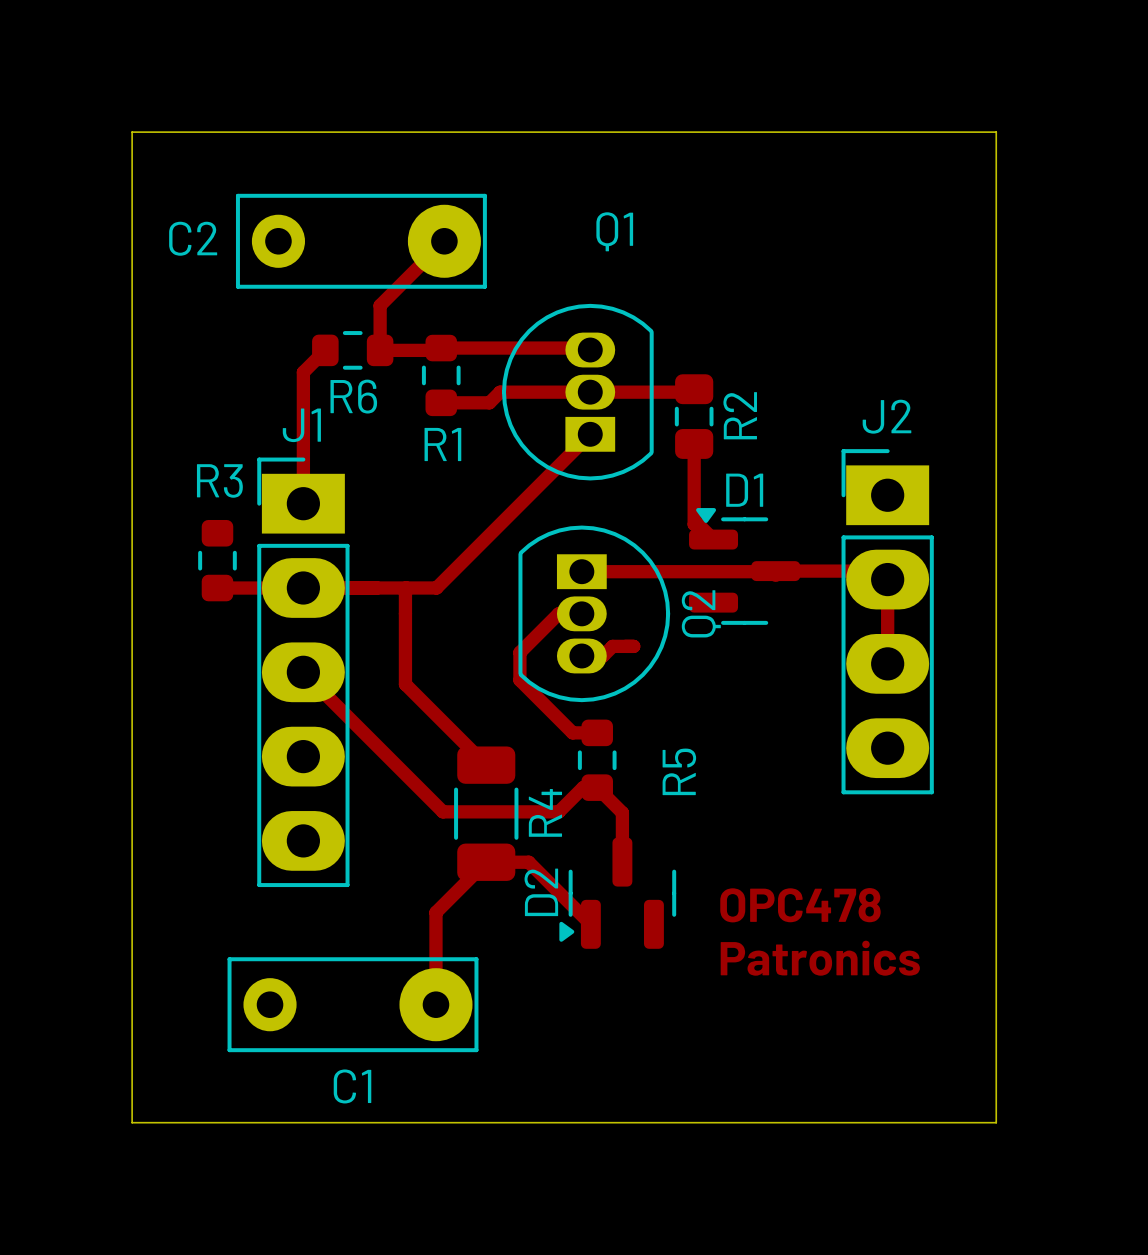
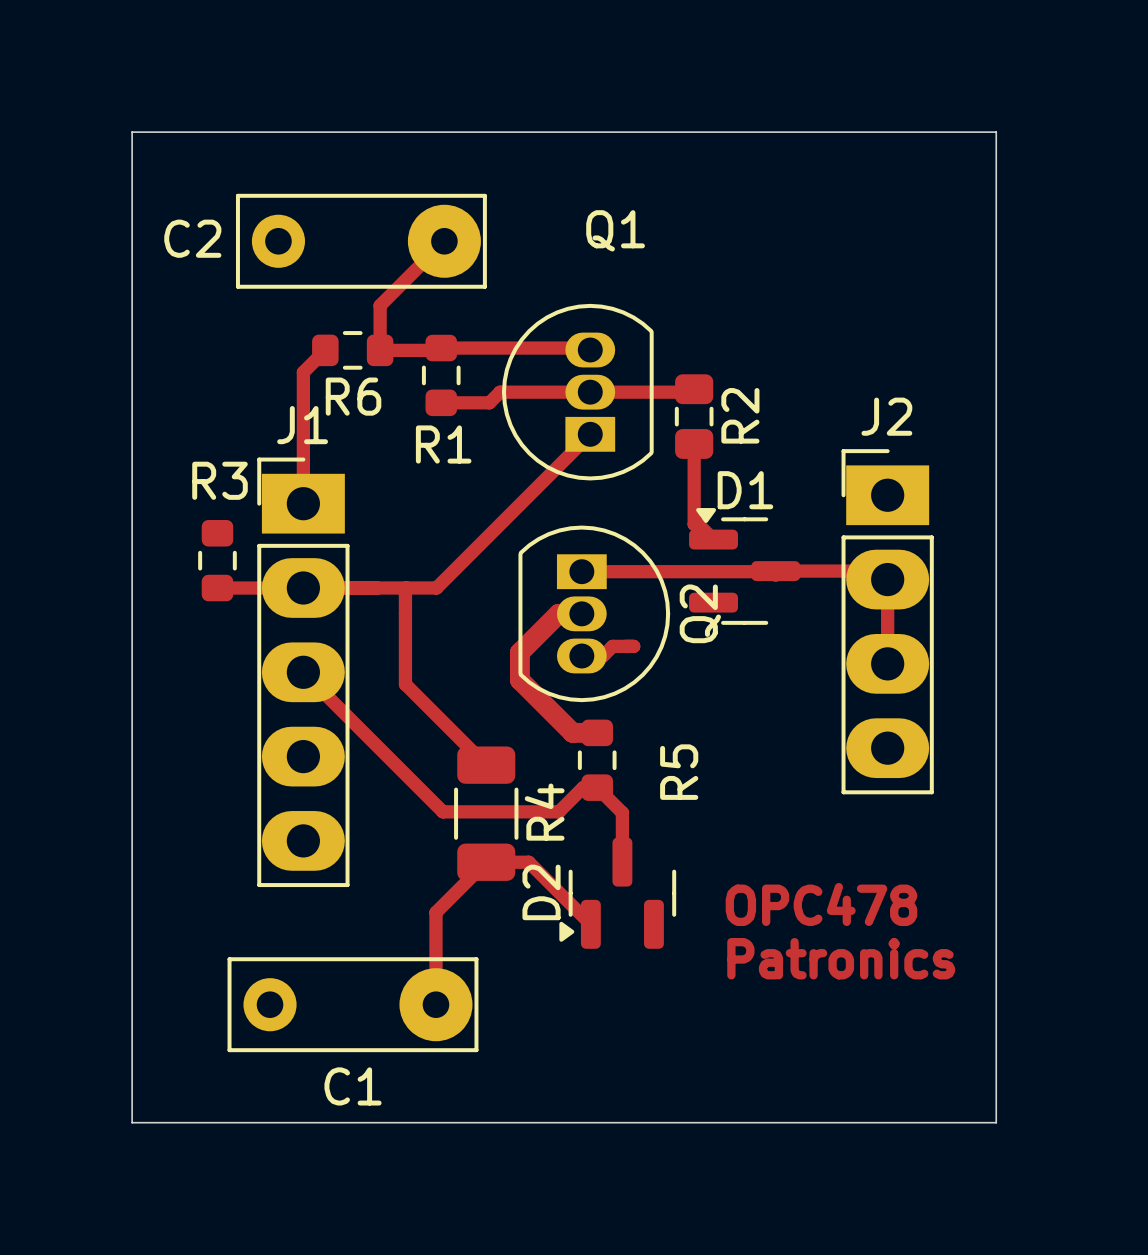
track width: thin (581, 613) (558, 613) (519, 652) (519, 680) (572, 732) (597, 732) -> thick (581, 613) (558, 613) (519, 652) (519, 680) (572, 732) (597, 732)

